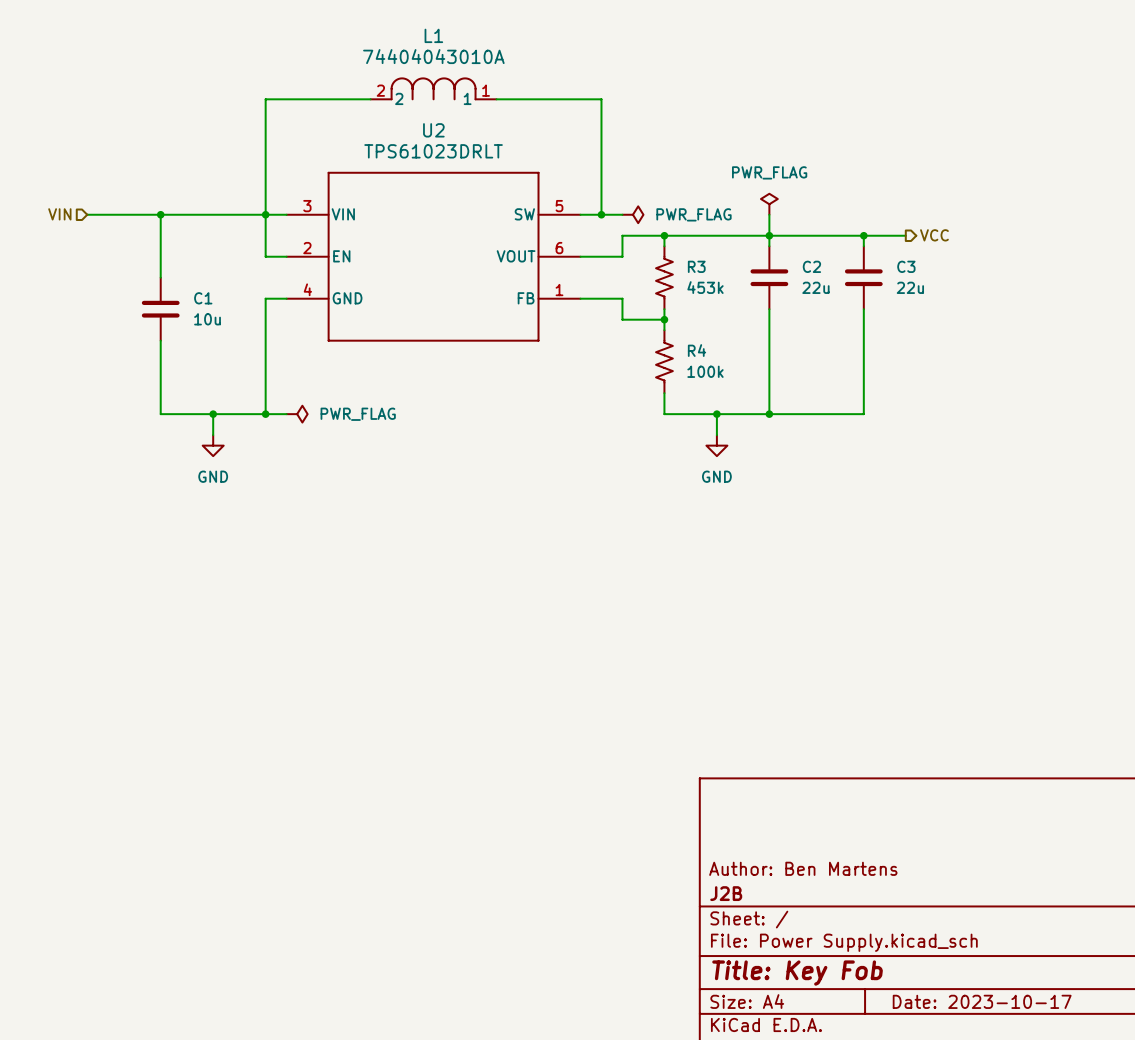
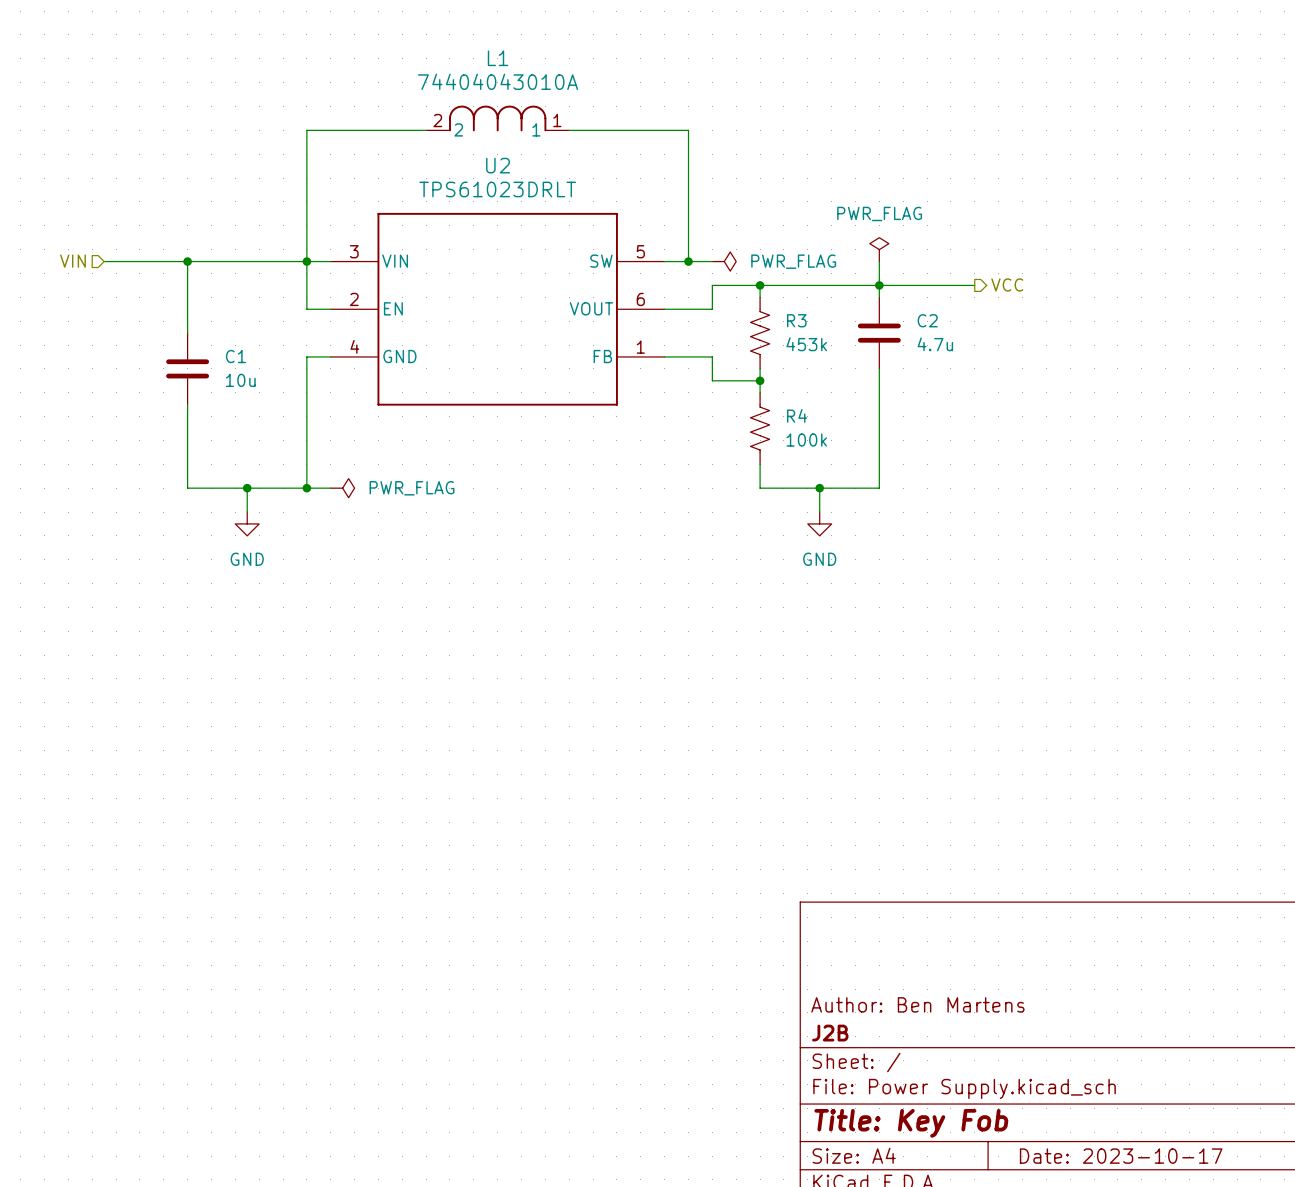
wire: (853, 235) (905, 235) -> none
wire: (863, 235) (863, 246) -> none
junction: (863, 235) -> none
hierarchical label position: VCC (934, 235) -> VCC (1007, 284)
C3: 22u (863, 277) -> none
C2 value: 22u (815, 287) -> 4.7u (935, 344)
wire: (863, 309) (863, 414) (769, 414) -> none
junction: (769, 414) -> none

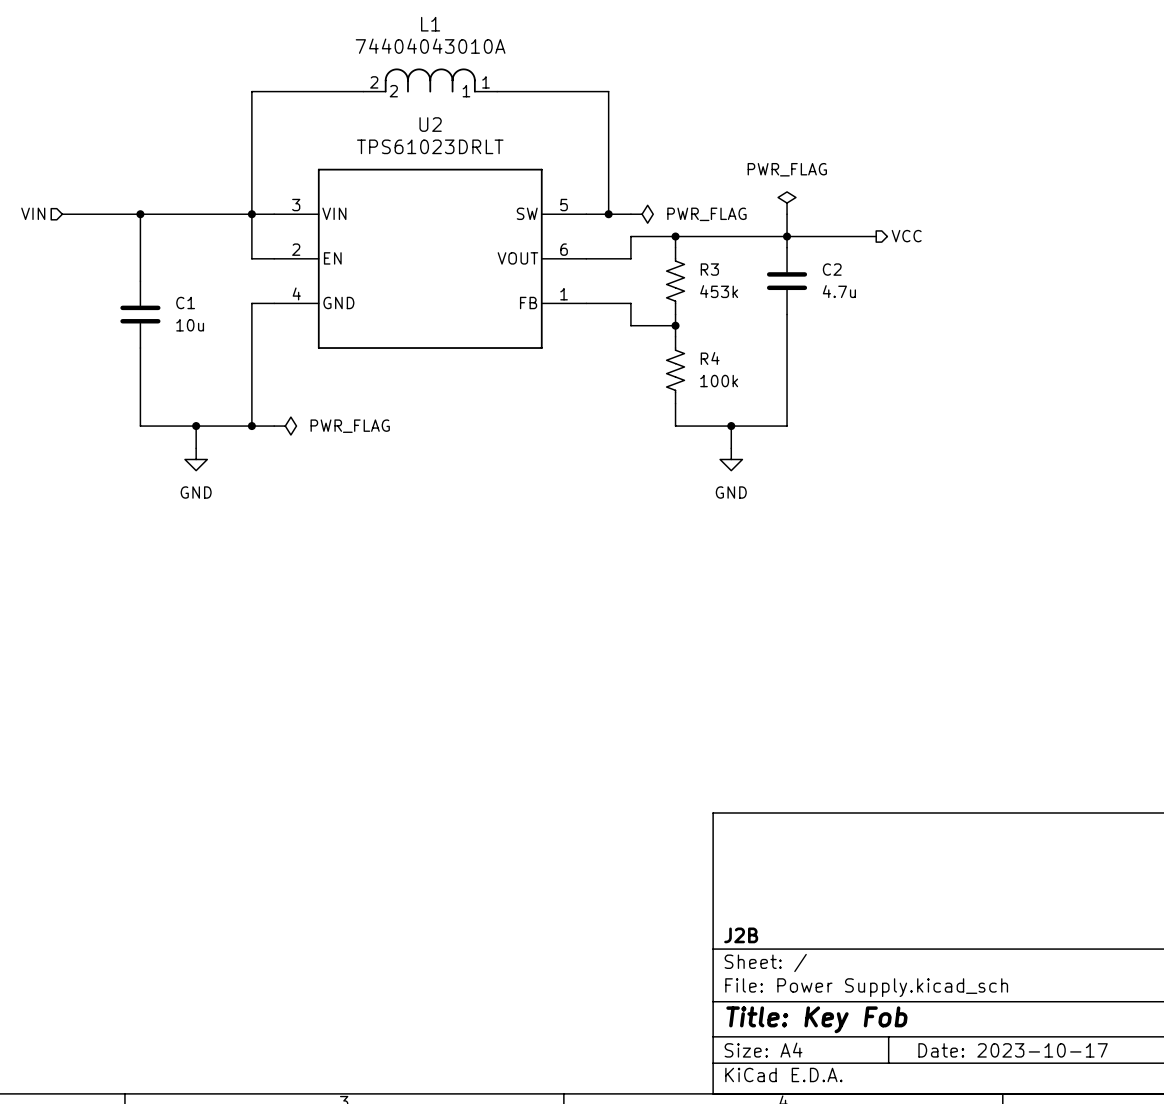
title block: Author: Ben Martens (917, 1004) -> none

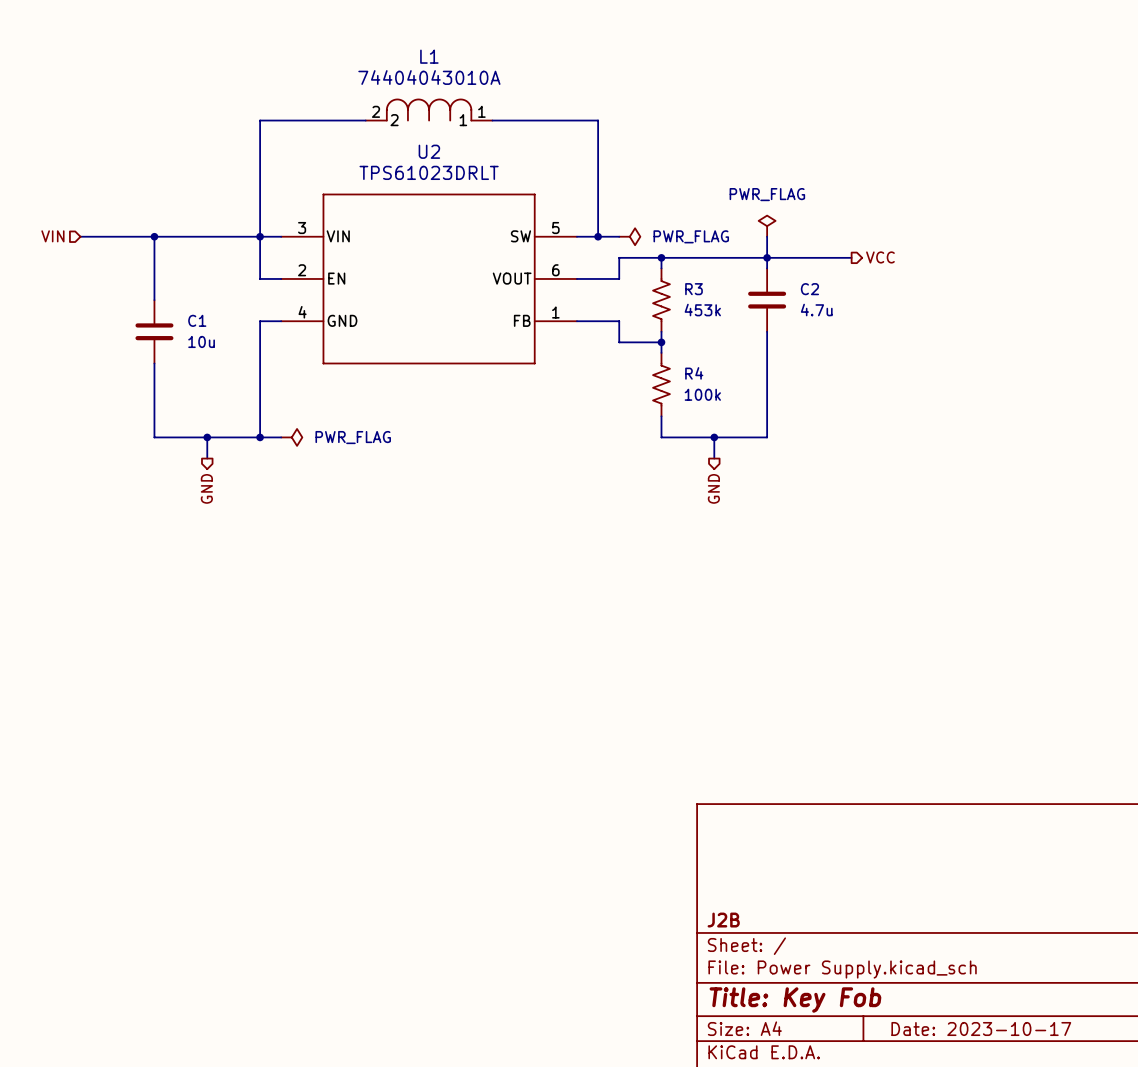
power symbol: GND (196, 459) -> none
power symbol: GND (731, 459) -> none
hierarchical label: none -> GND (206, 488)
hierarchical label: none -> GND (713, 488)

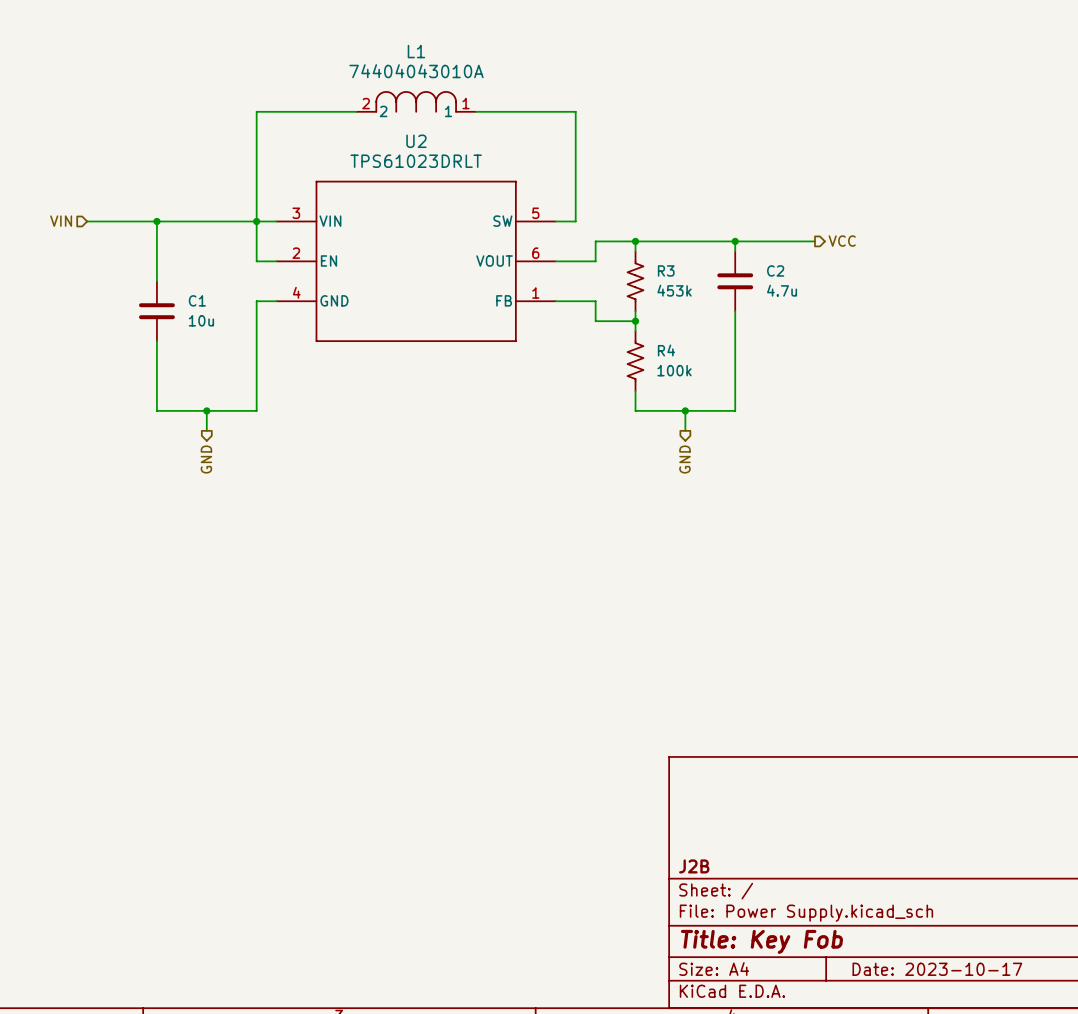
power symbol: PWR_FLAG (767, 226) -> none
wire: (598, 236) (619, 236) -> none
junction: (598, 236) -> none
power symbol: PWR_FLAG (629, 236) -> none
wire: (767, 236) (767, 257) -> none
wire: (260, 437) (281, 437) -> none
junction: (260, 437) -> none
power symbol: PWR_FLAG (291, 437) -> none

